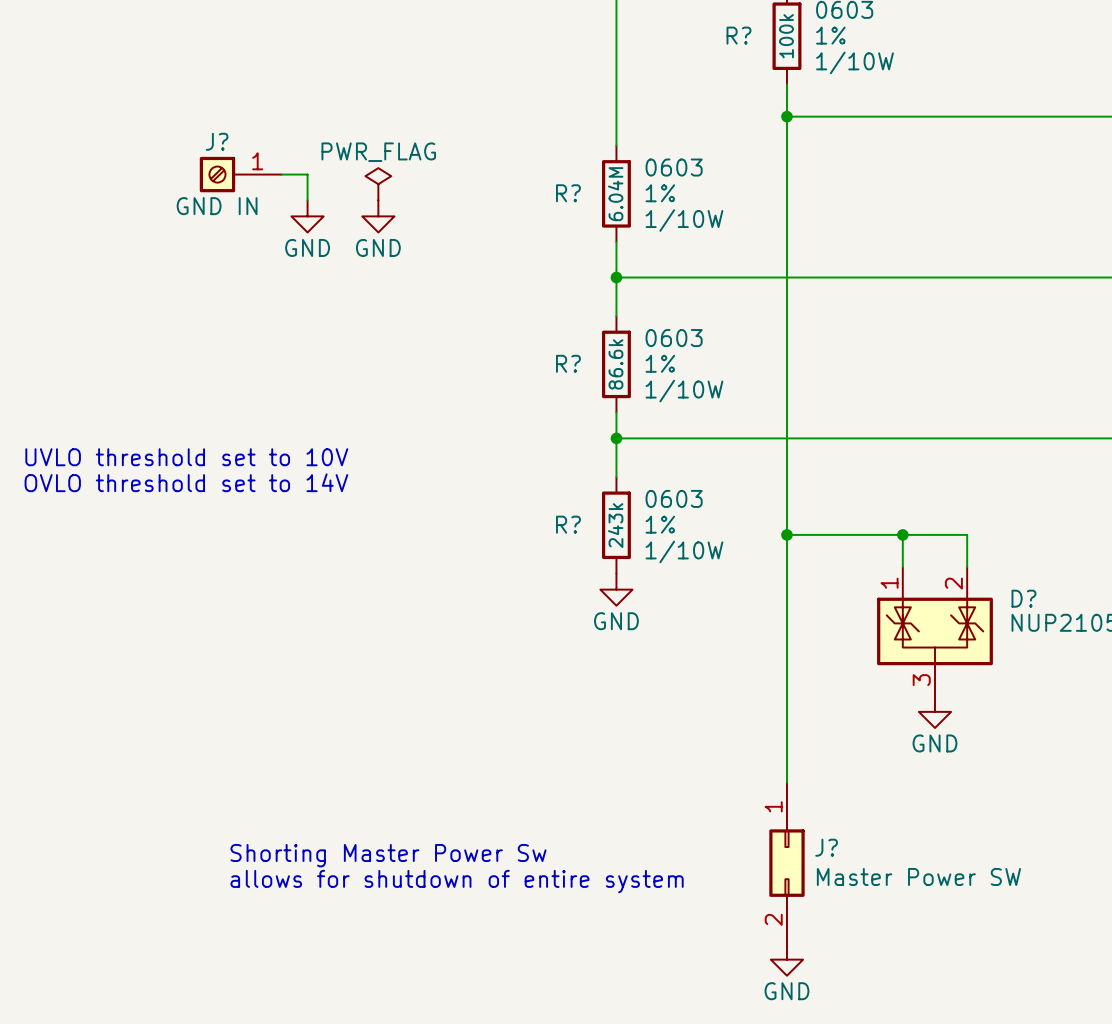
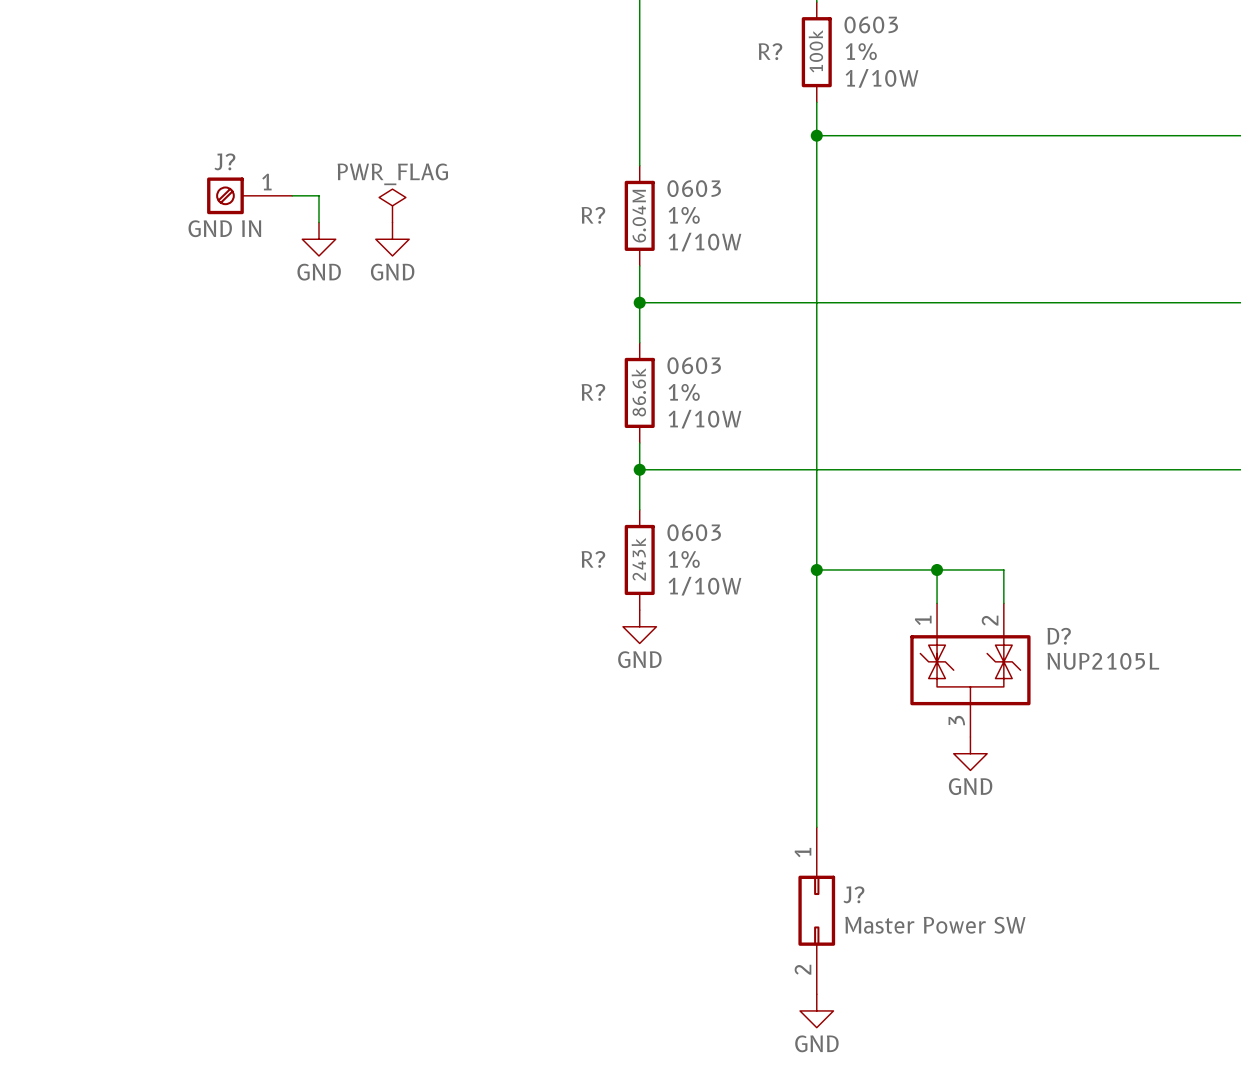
text: UVLO threshold set to 10V (186, 457) -> none
text: OVLO threshold set to 14V (186, 482) -> none
text: Shorting Master Power Sw (388, 855) -> none
text: allows for shutdown of entire system (457, 881) -> none

